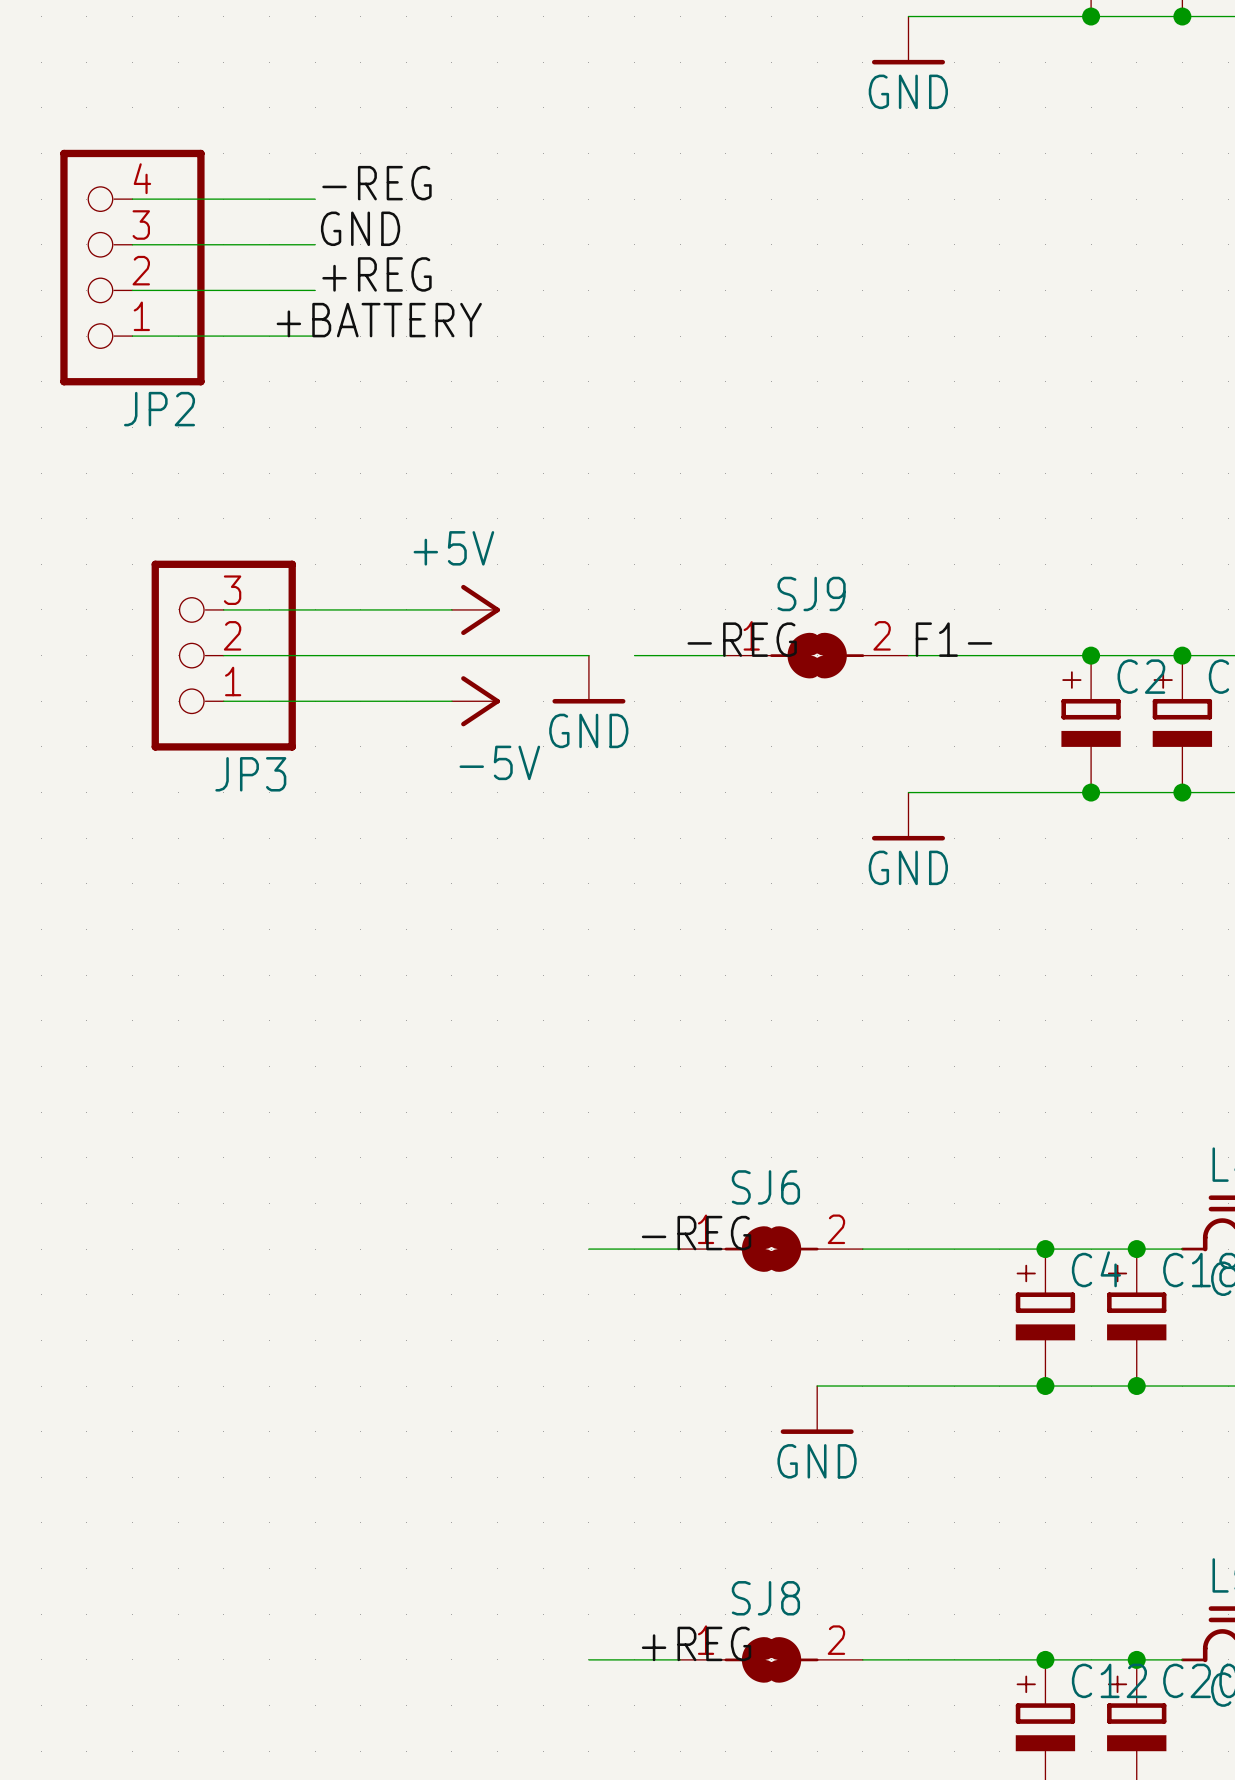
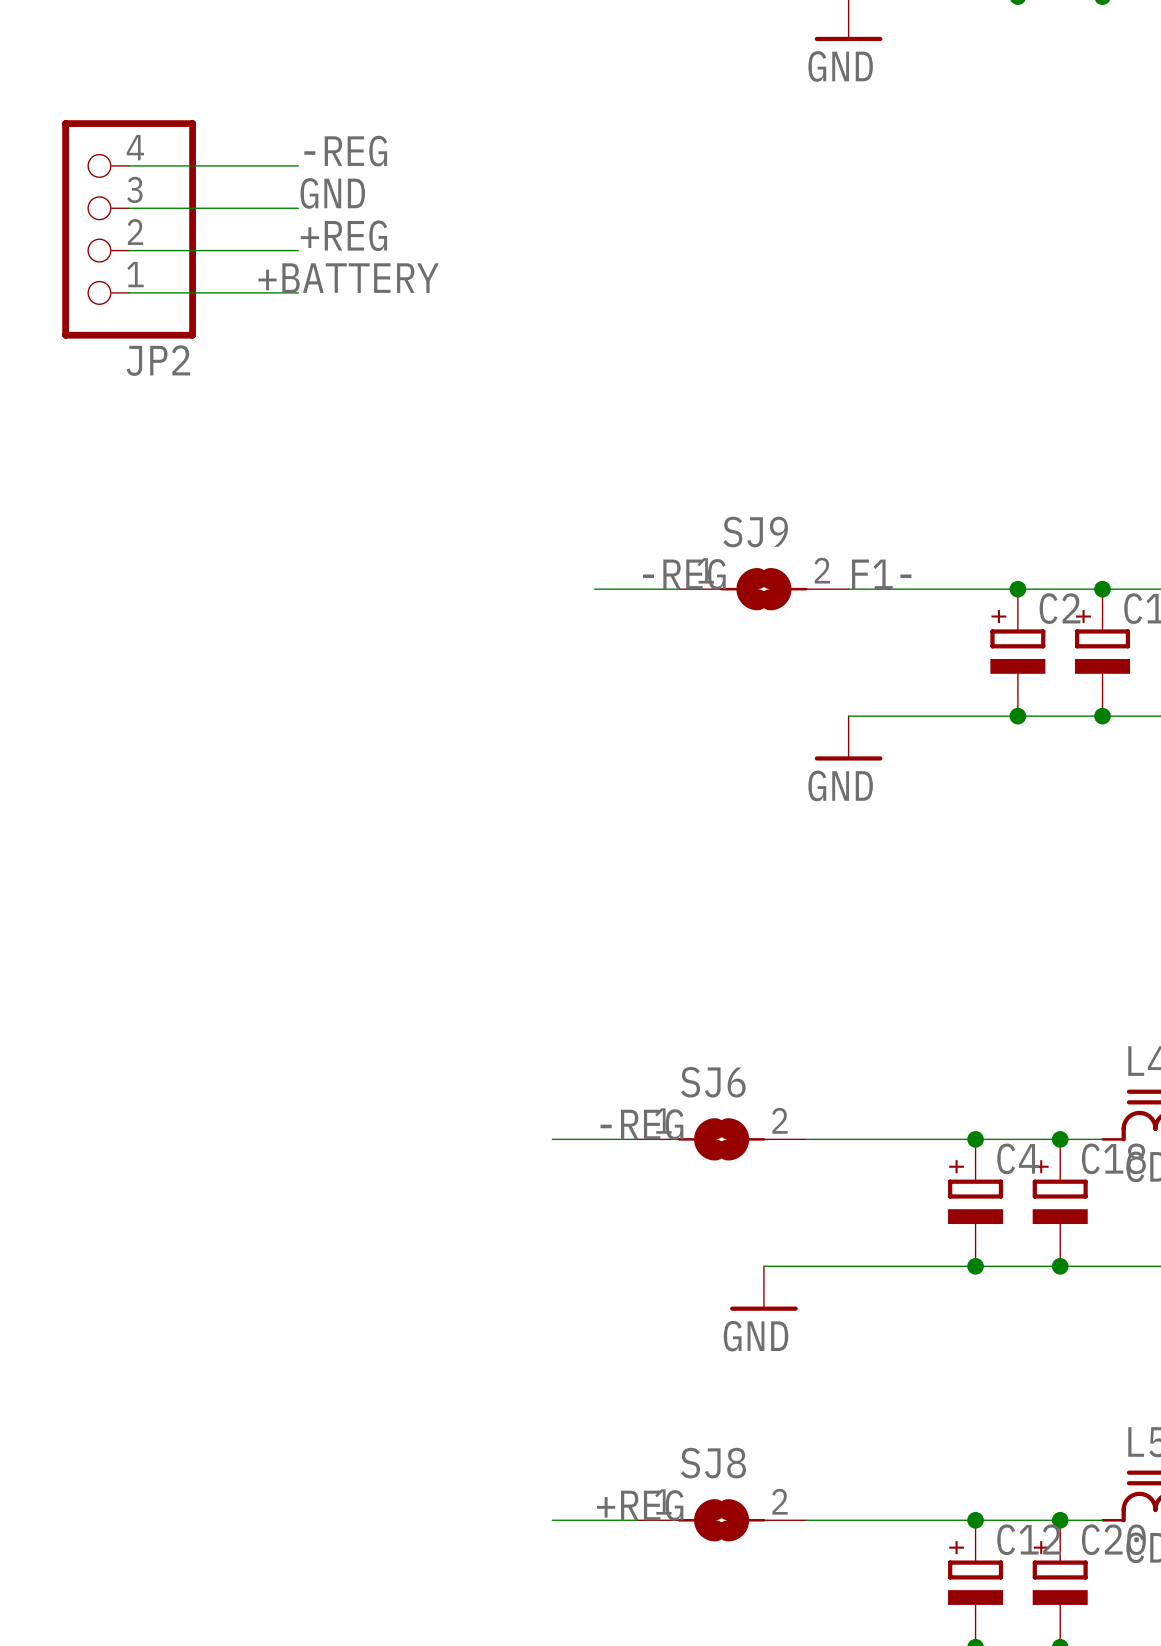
wire: (223, 609) (451, 609) -> none
power symbol: +5V (475, 609) -> none
wire: (223, 655) (588, 655) -> none
JP3: (223, 655) -> none
power symbol: GND (588, 679) -> none
wire: (223, 701) (451, 701) -> none
power symbol: -5V (475, 701) -> none

